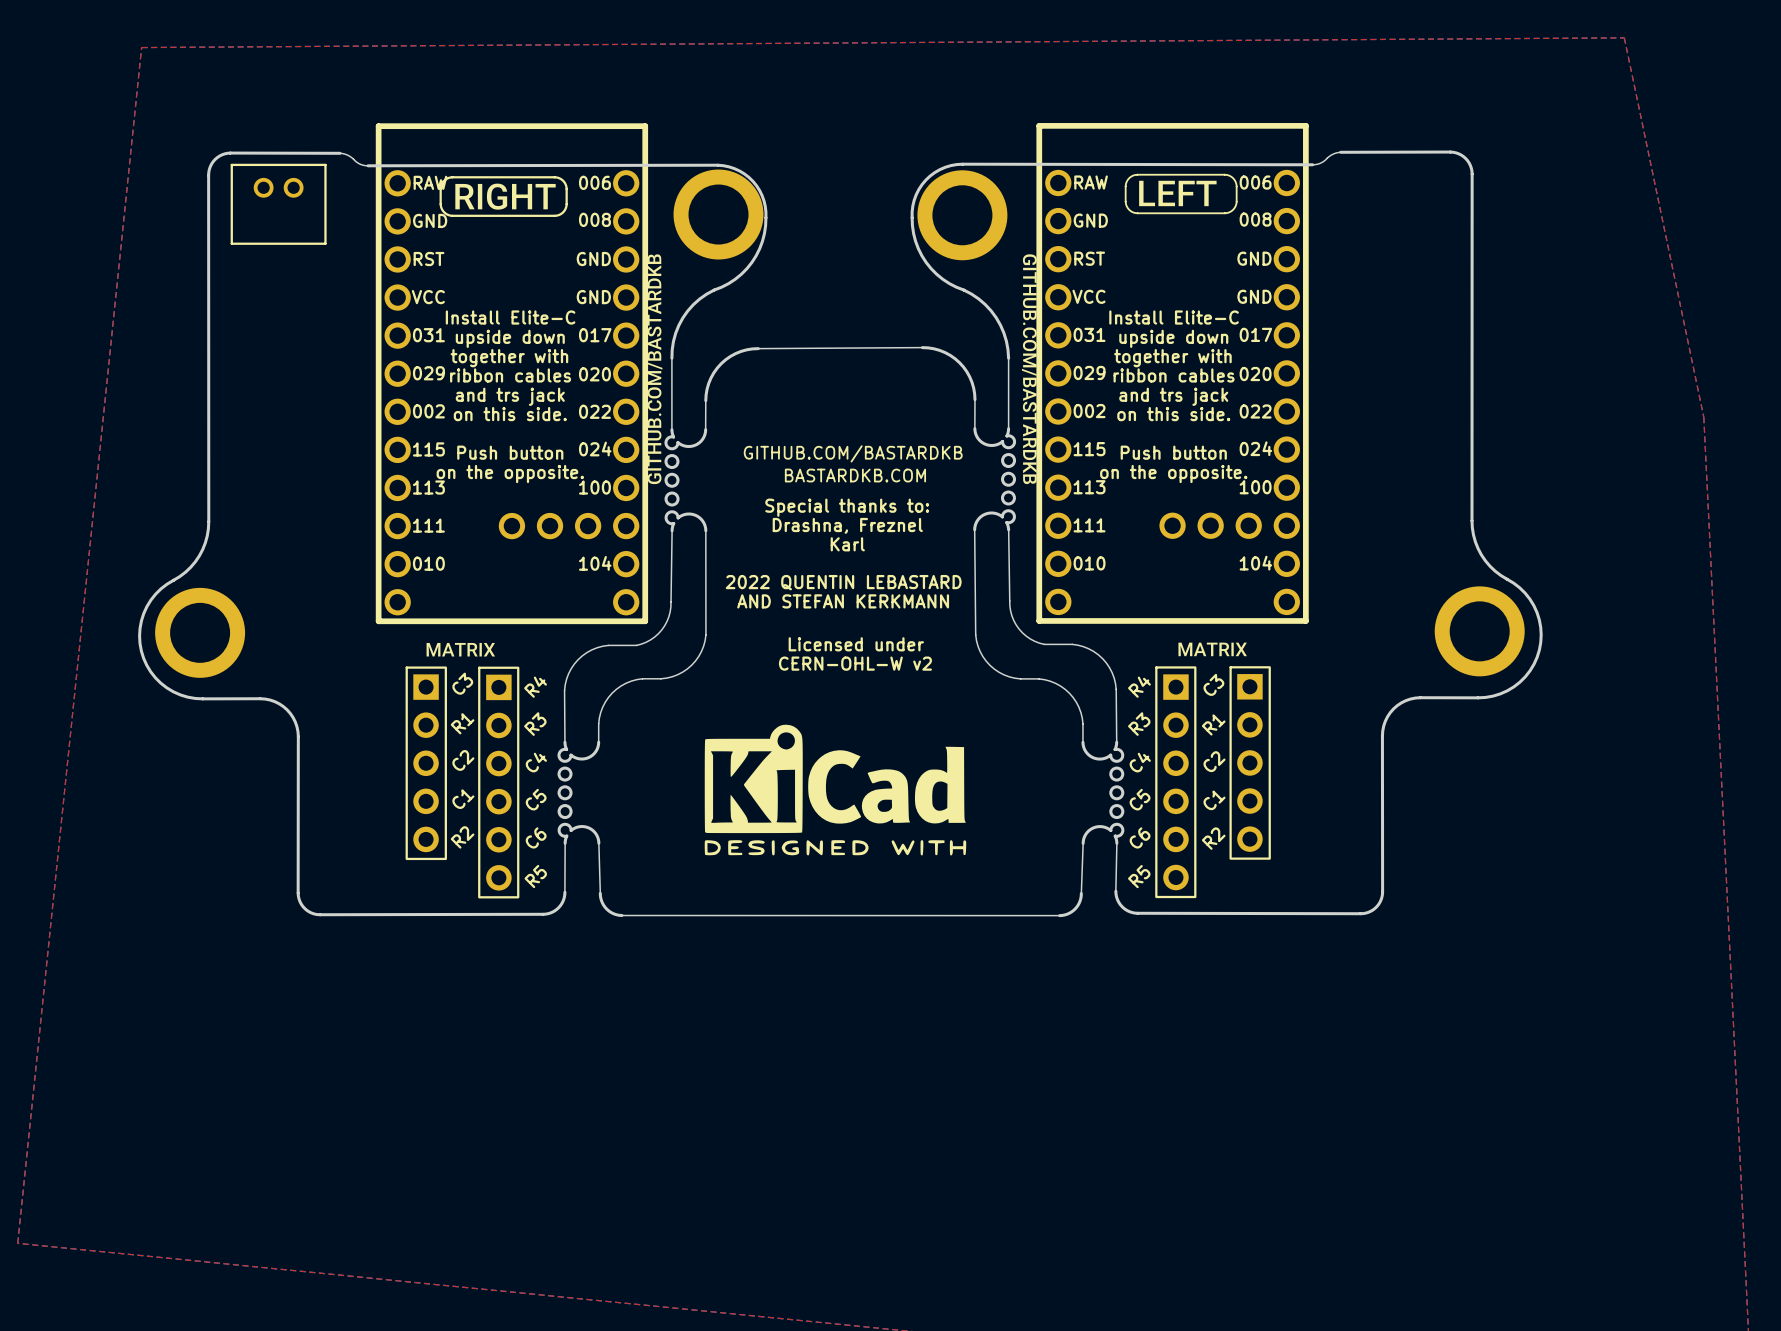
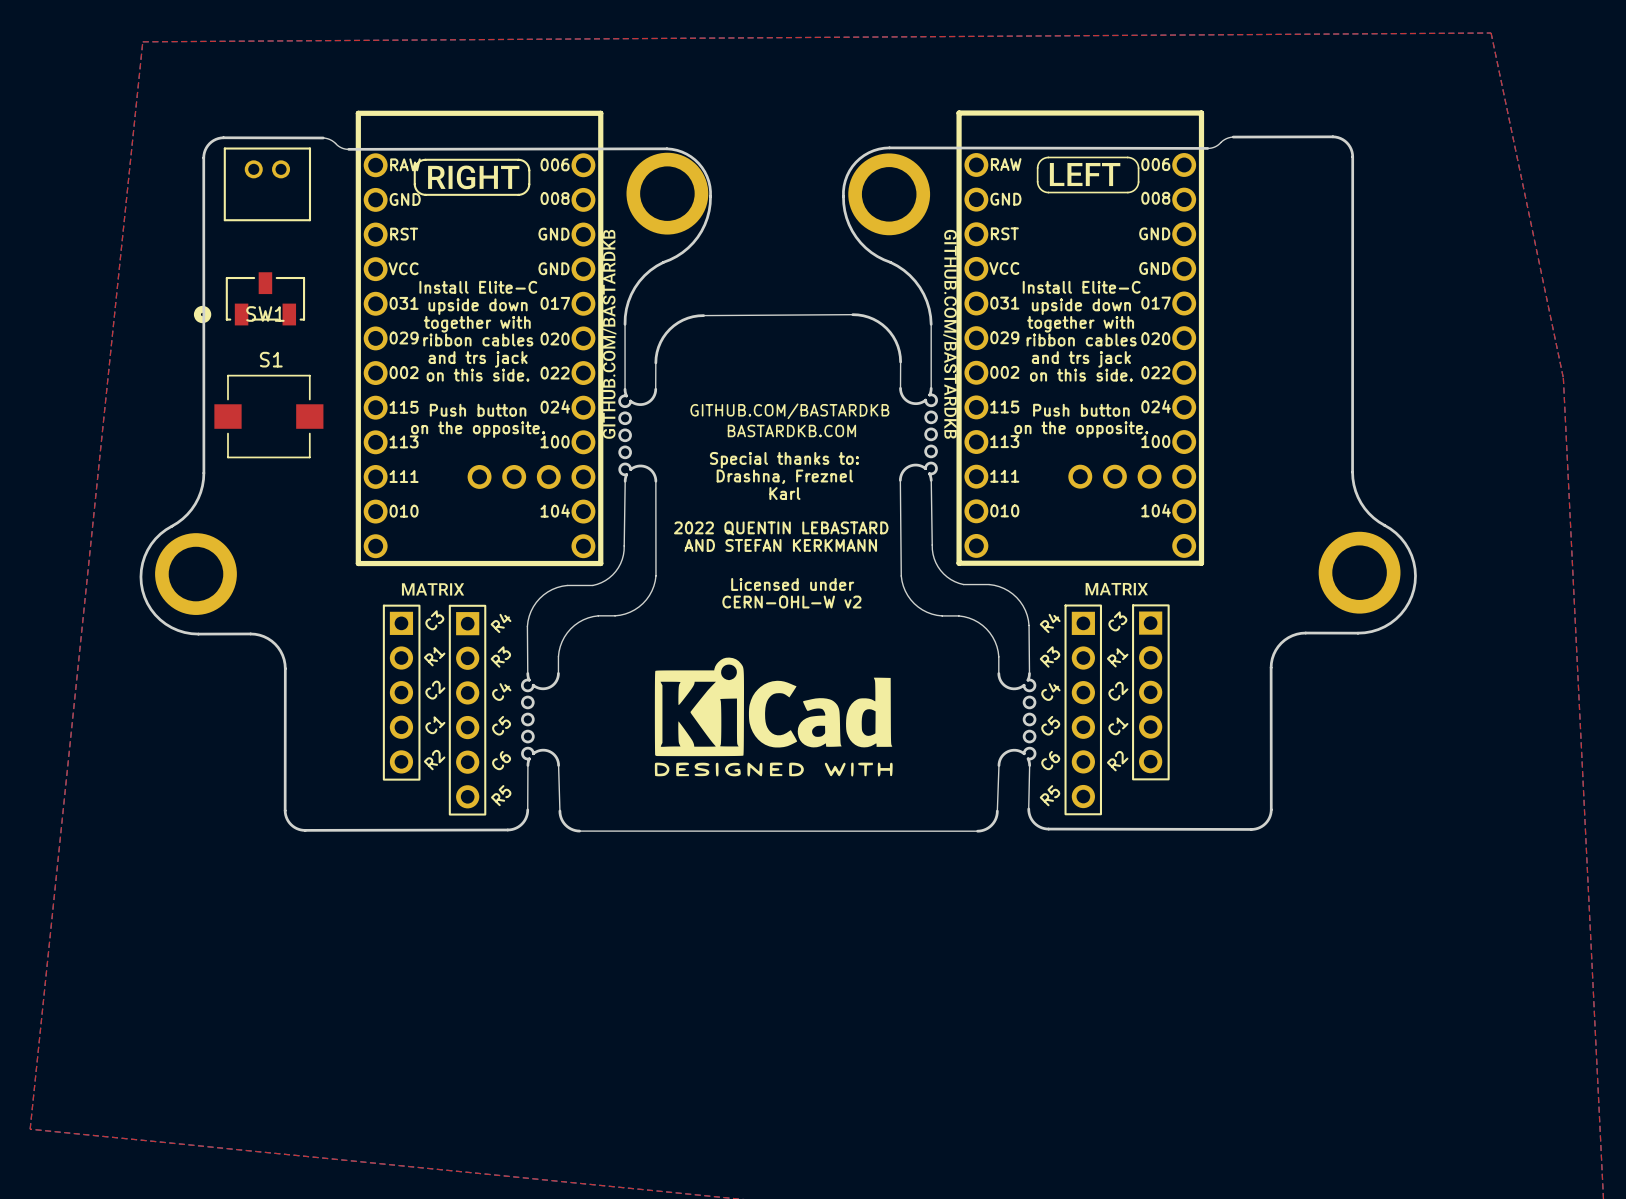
SW1: none -> (249, 298)
S1: none -> (268, 416)

